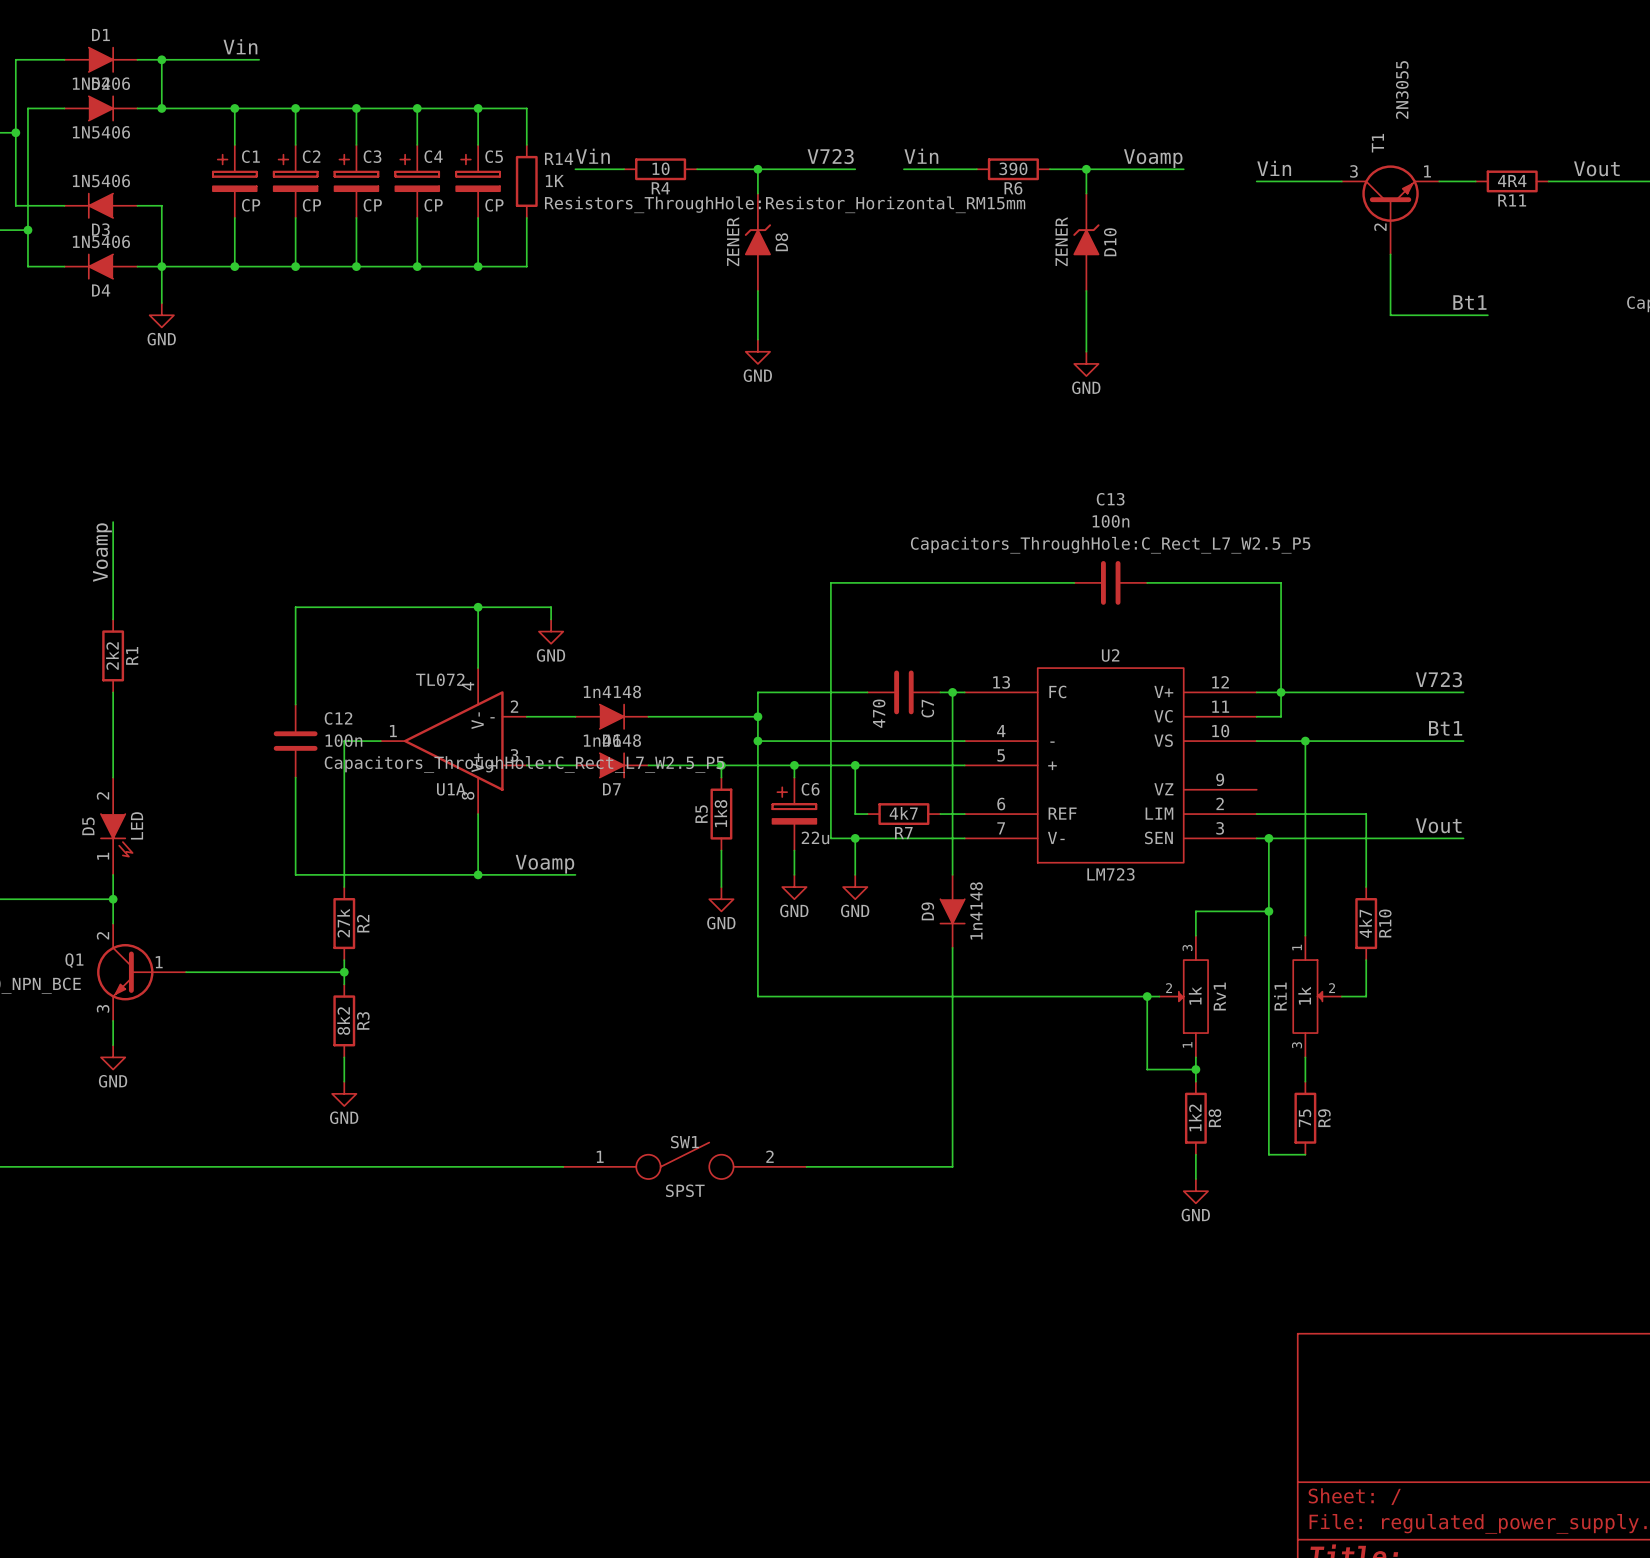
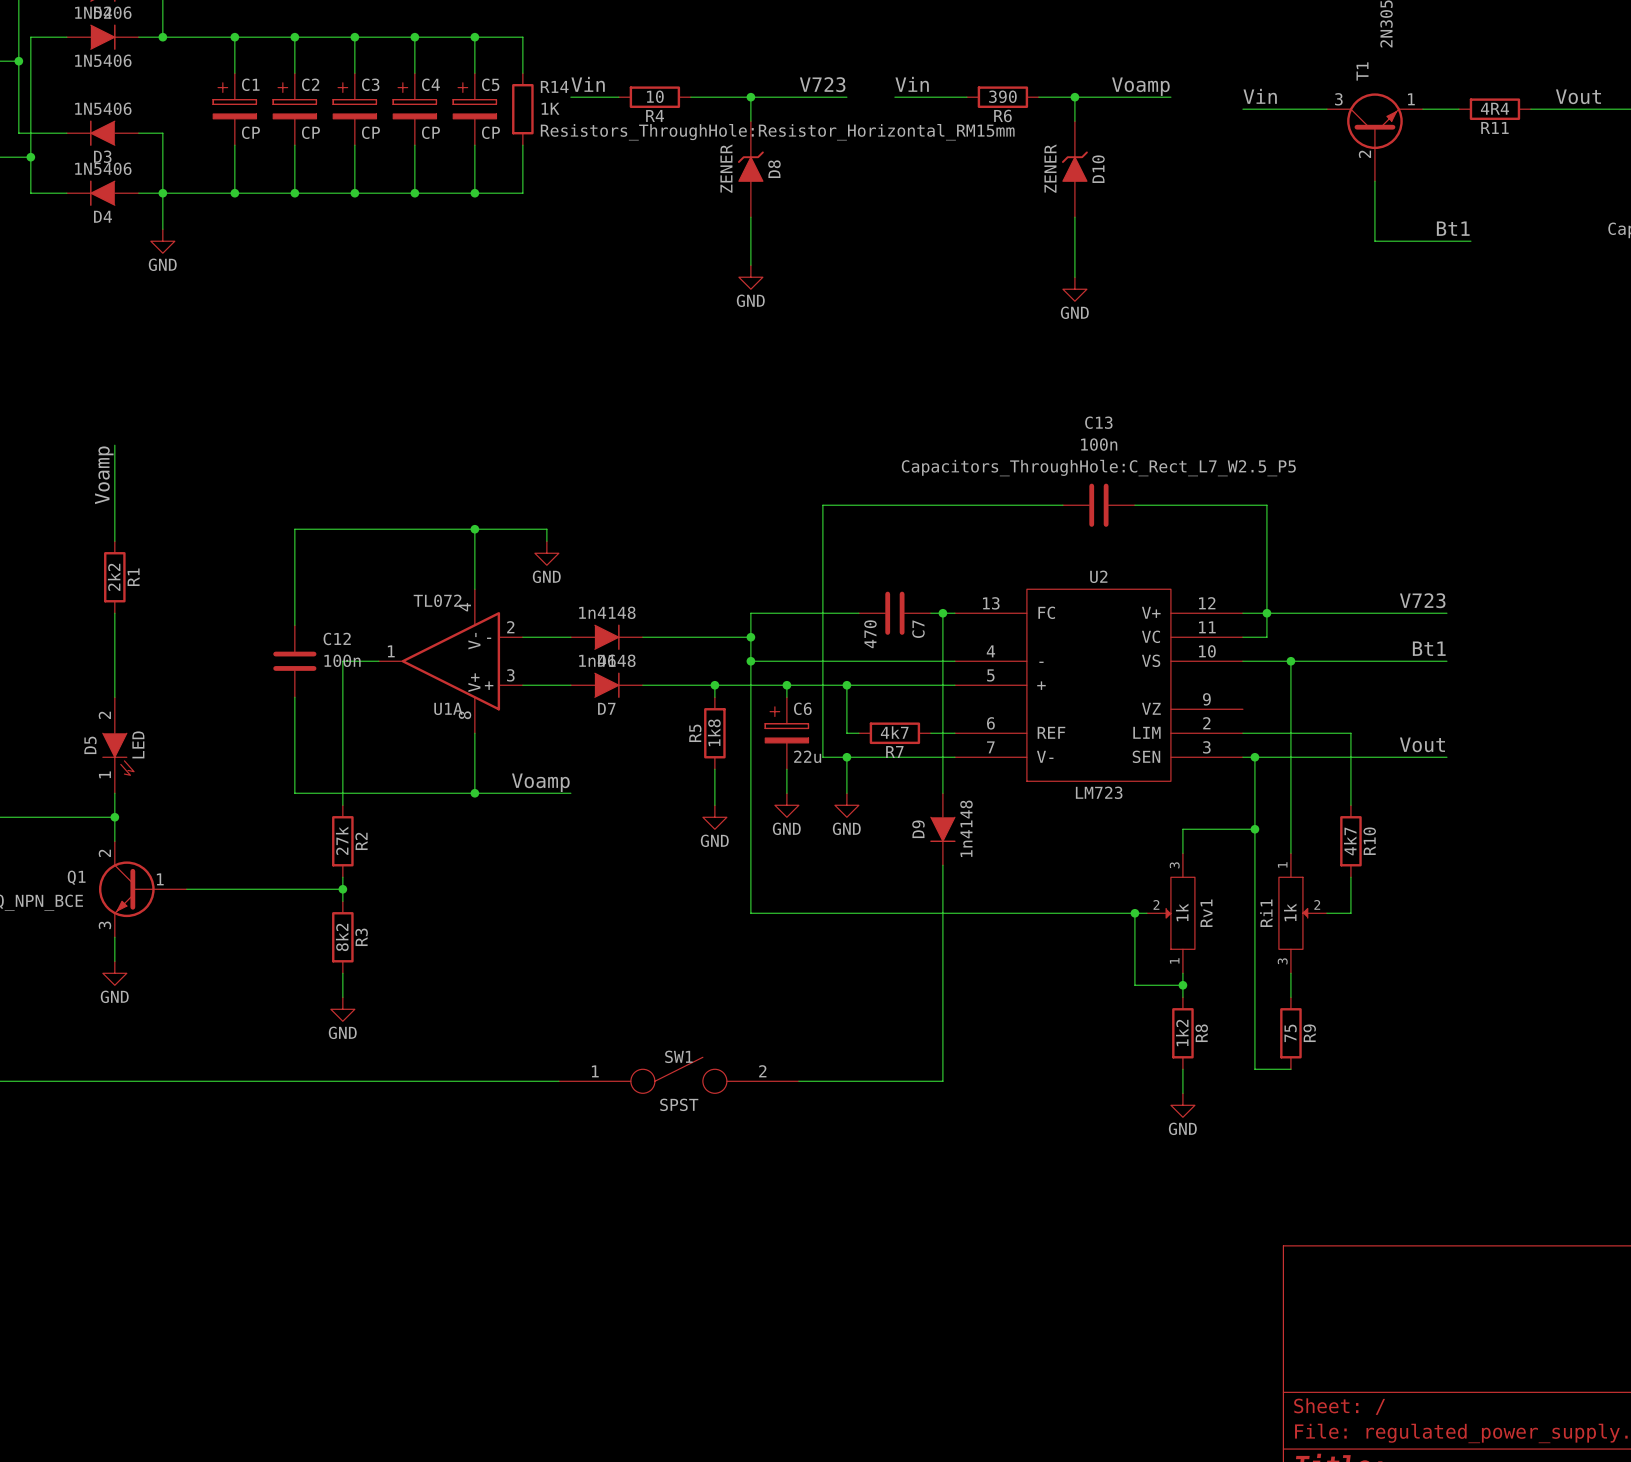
C12 text: Capacitors_ThroughHole:C_Rect_L7_W2.5_P5 (524, 764) -> none

